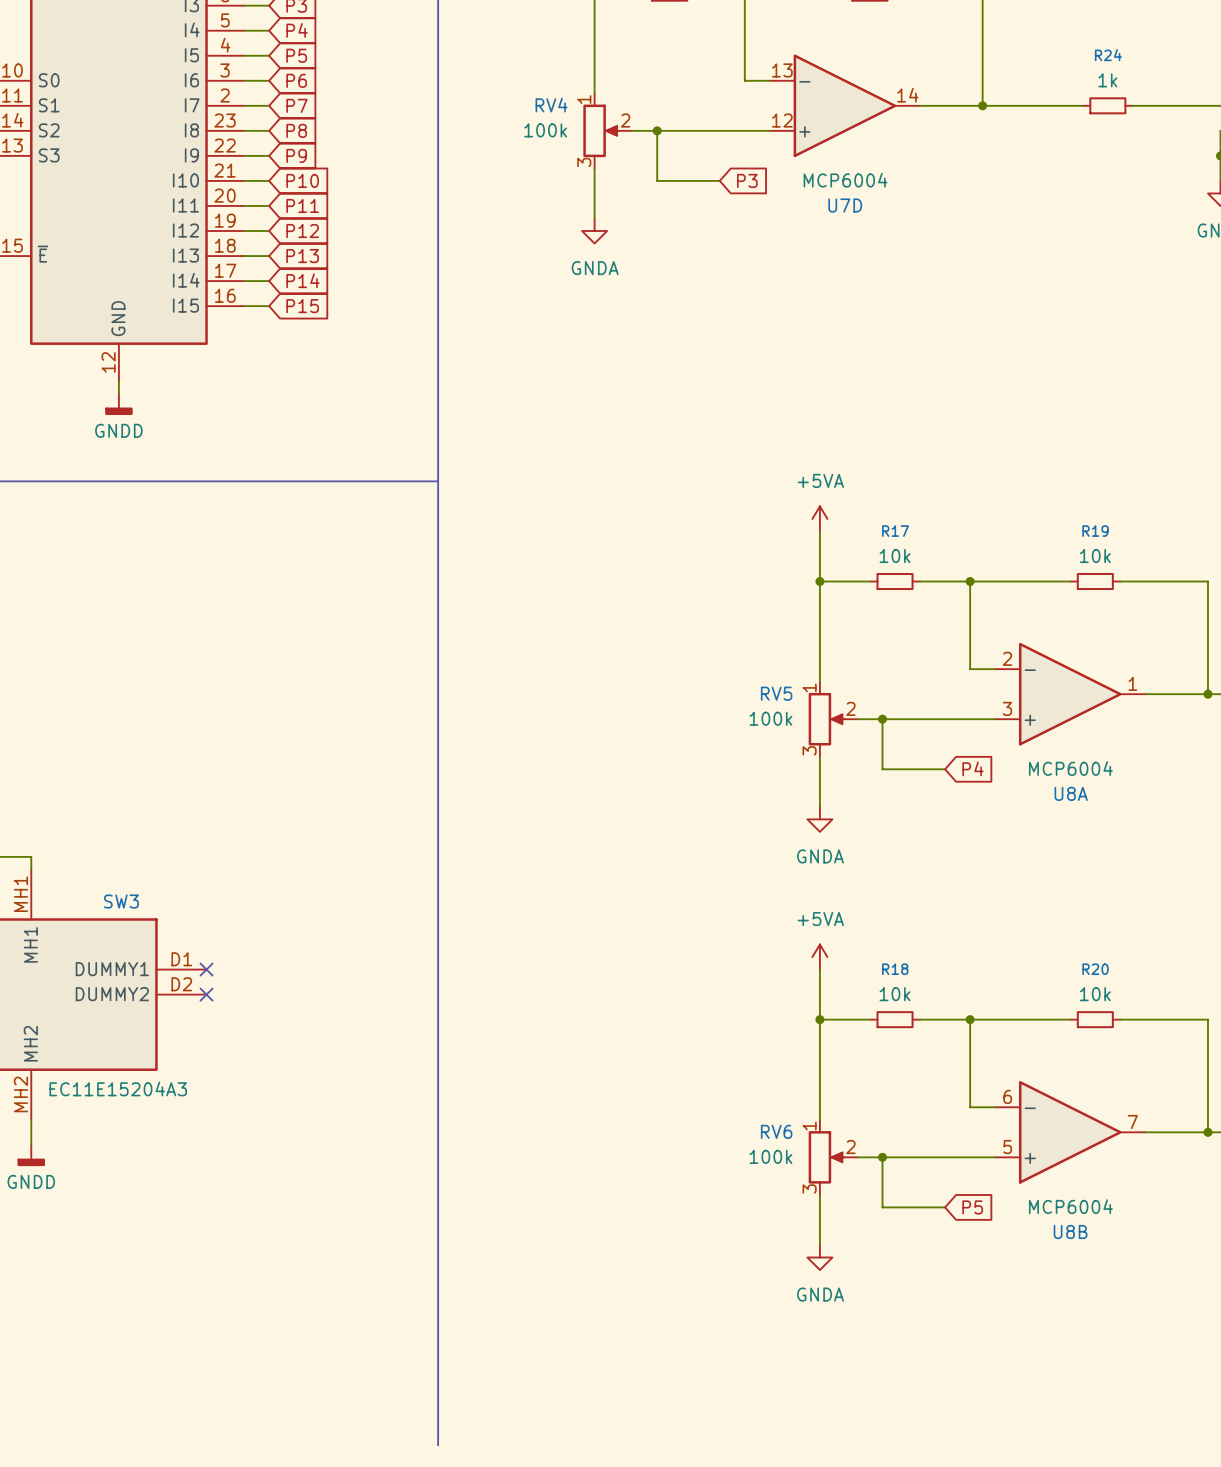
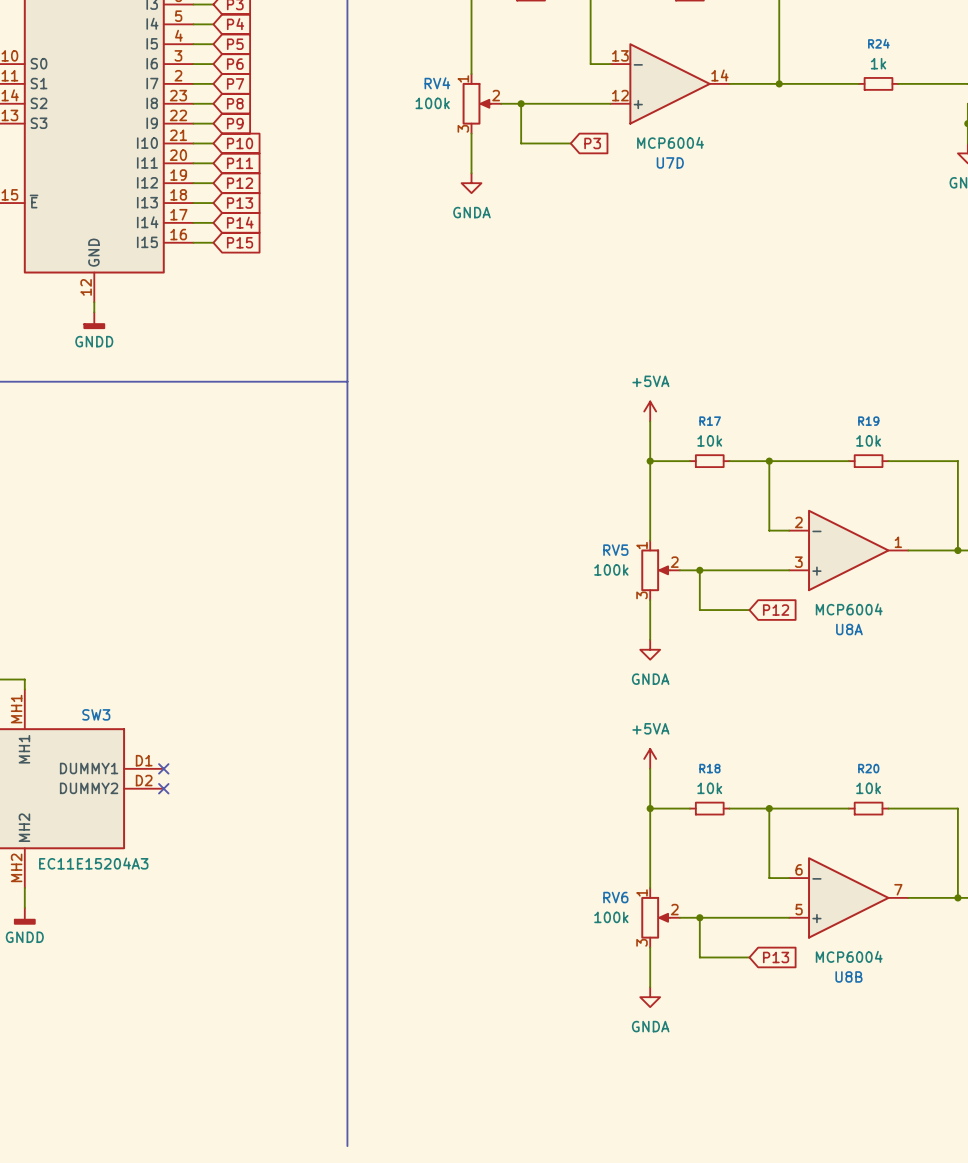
global label: P4 (972, 768) -> P12 (776, 610)
global label: P5 (972, 1207) -> P13 (776, 957)

